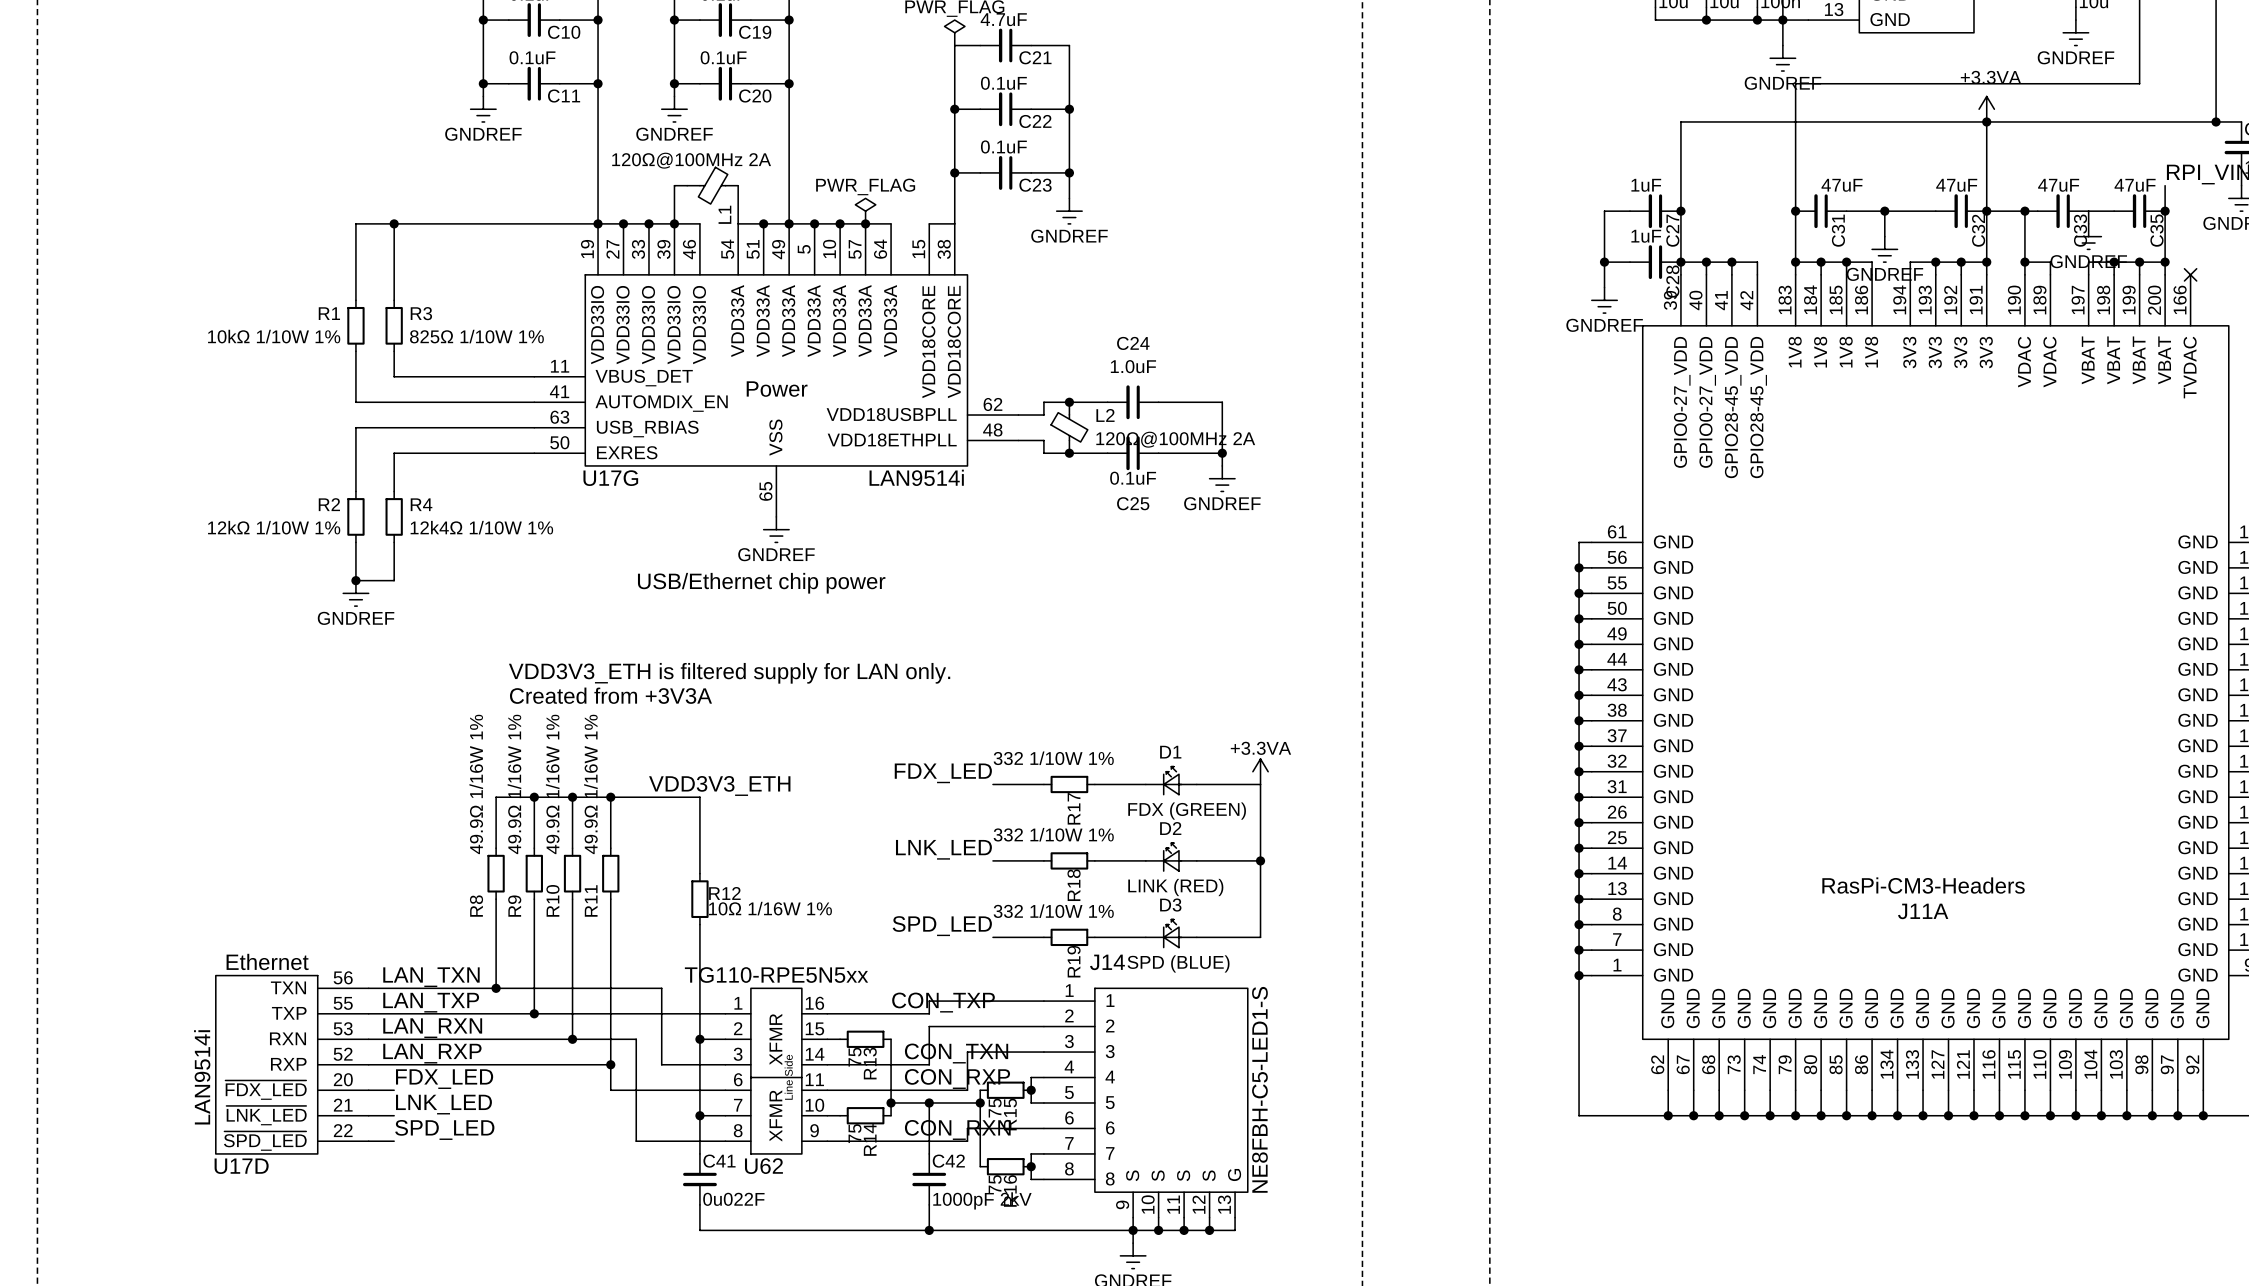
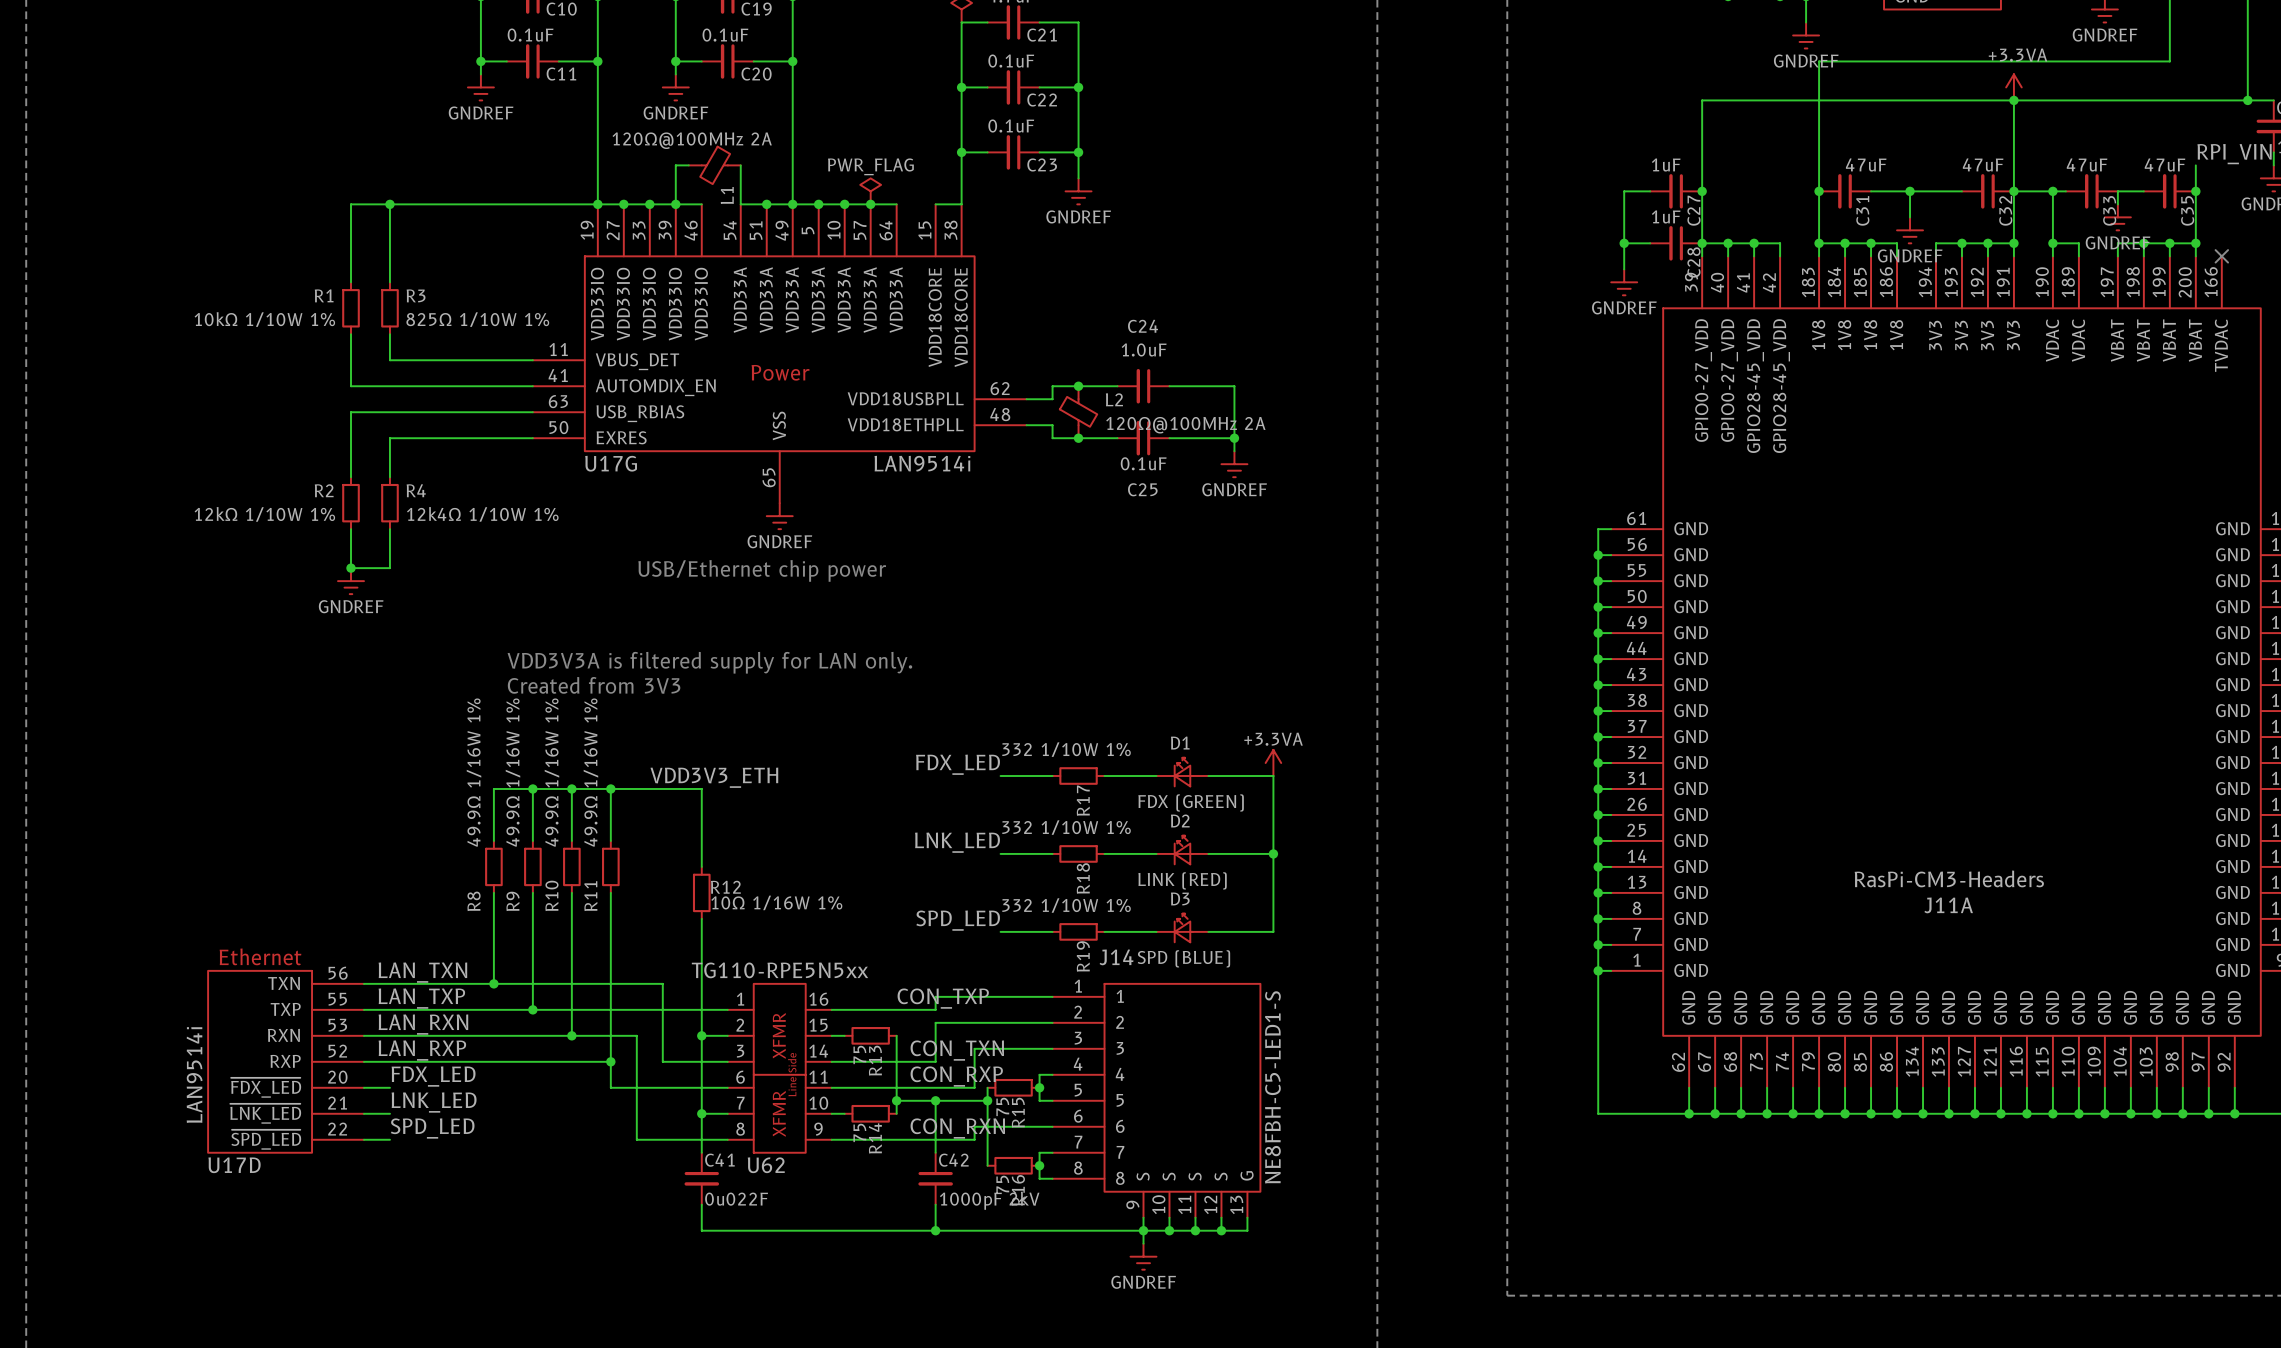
text: VDD3V3_ETH is filtered supply for LAN only. (729, 673) -> VDD3V3A is filtered supply for LAN only. (709, 662)
text: Created from +3V3A (610, 695) -> Created from 3V3 (594, 685)

